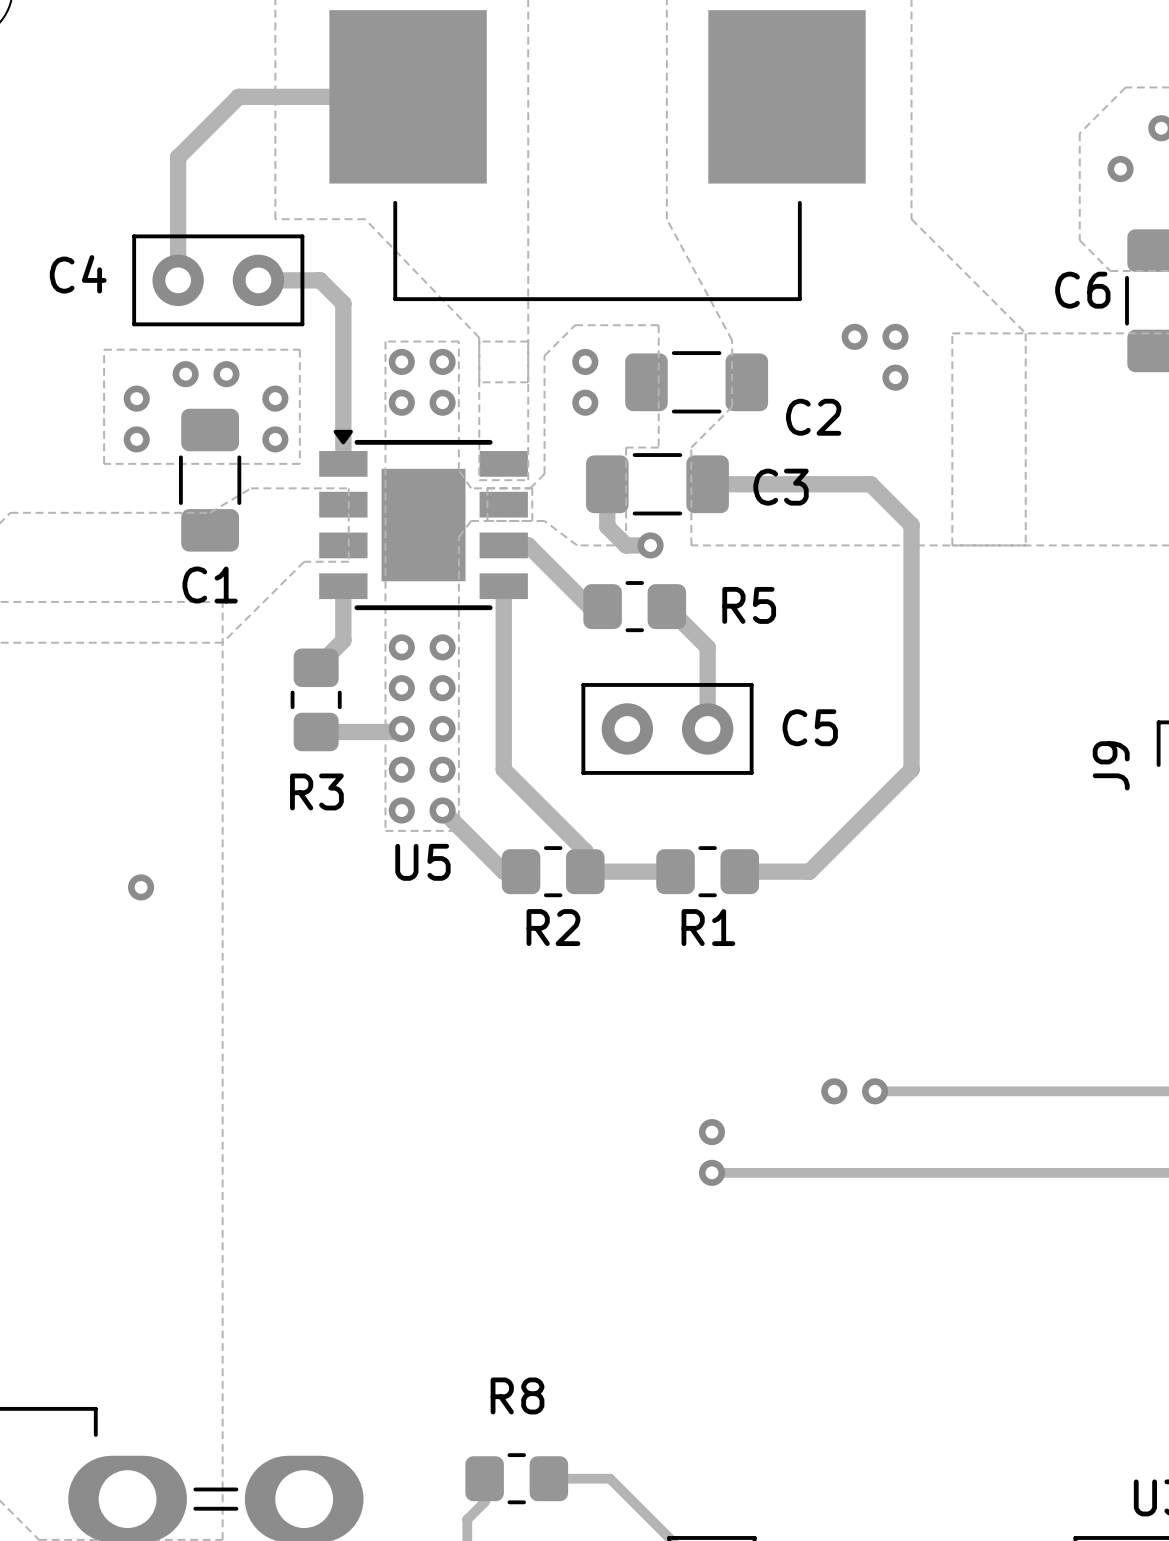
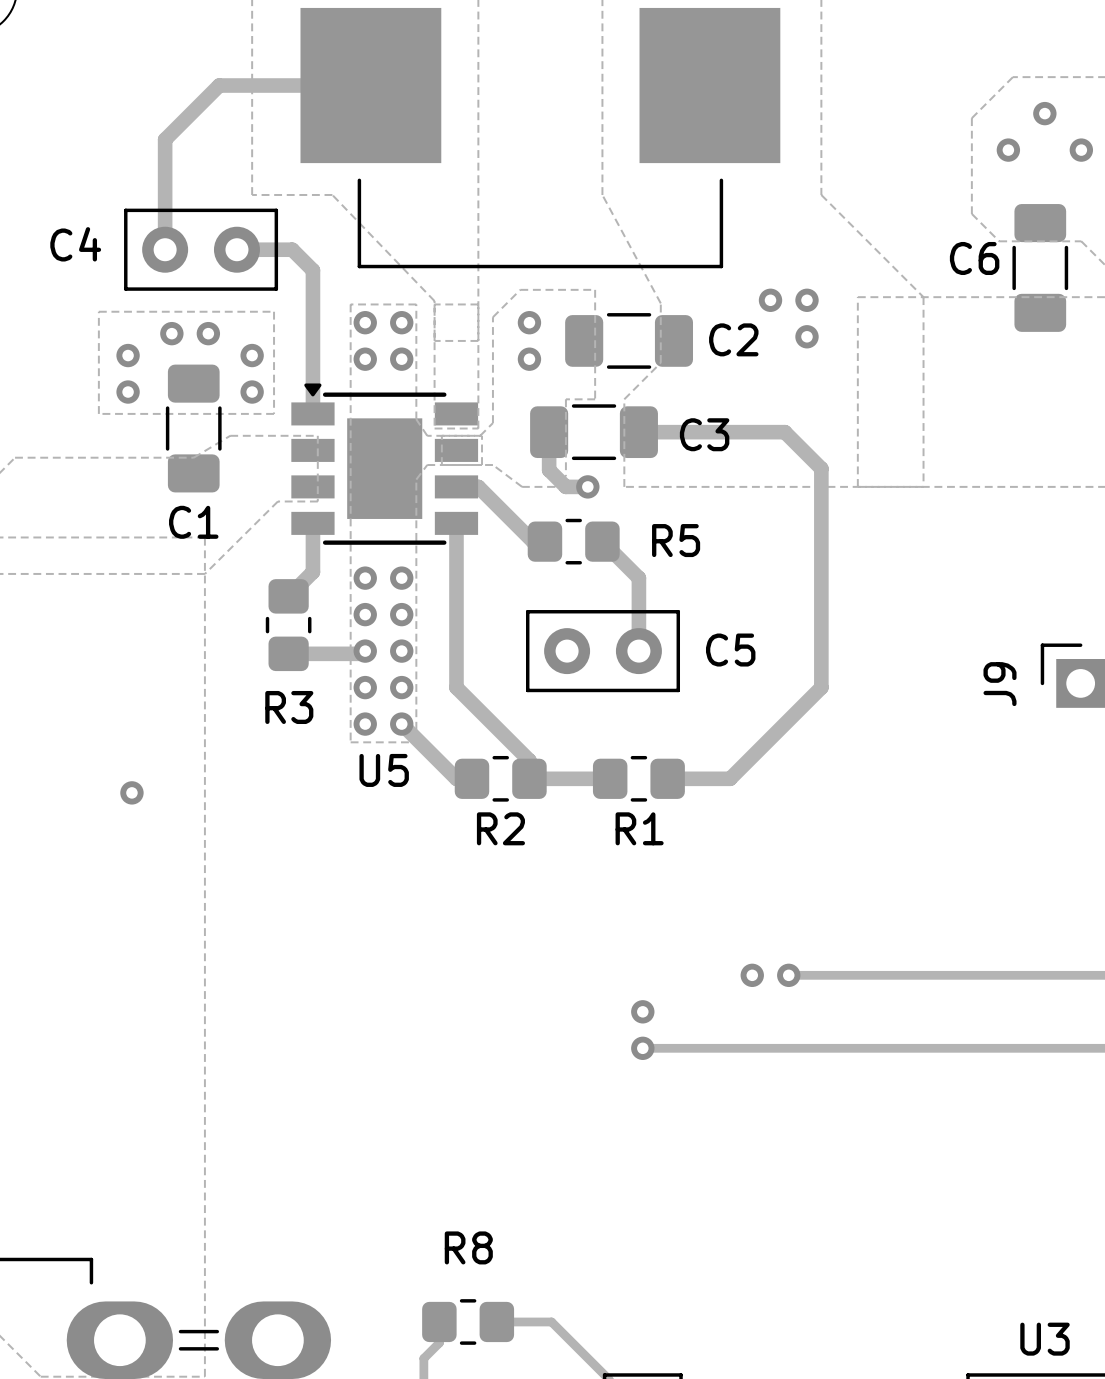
C2 name position: C2 (813, 417) -> C2 (733, 339)

